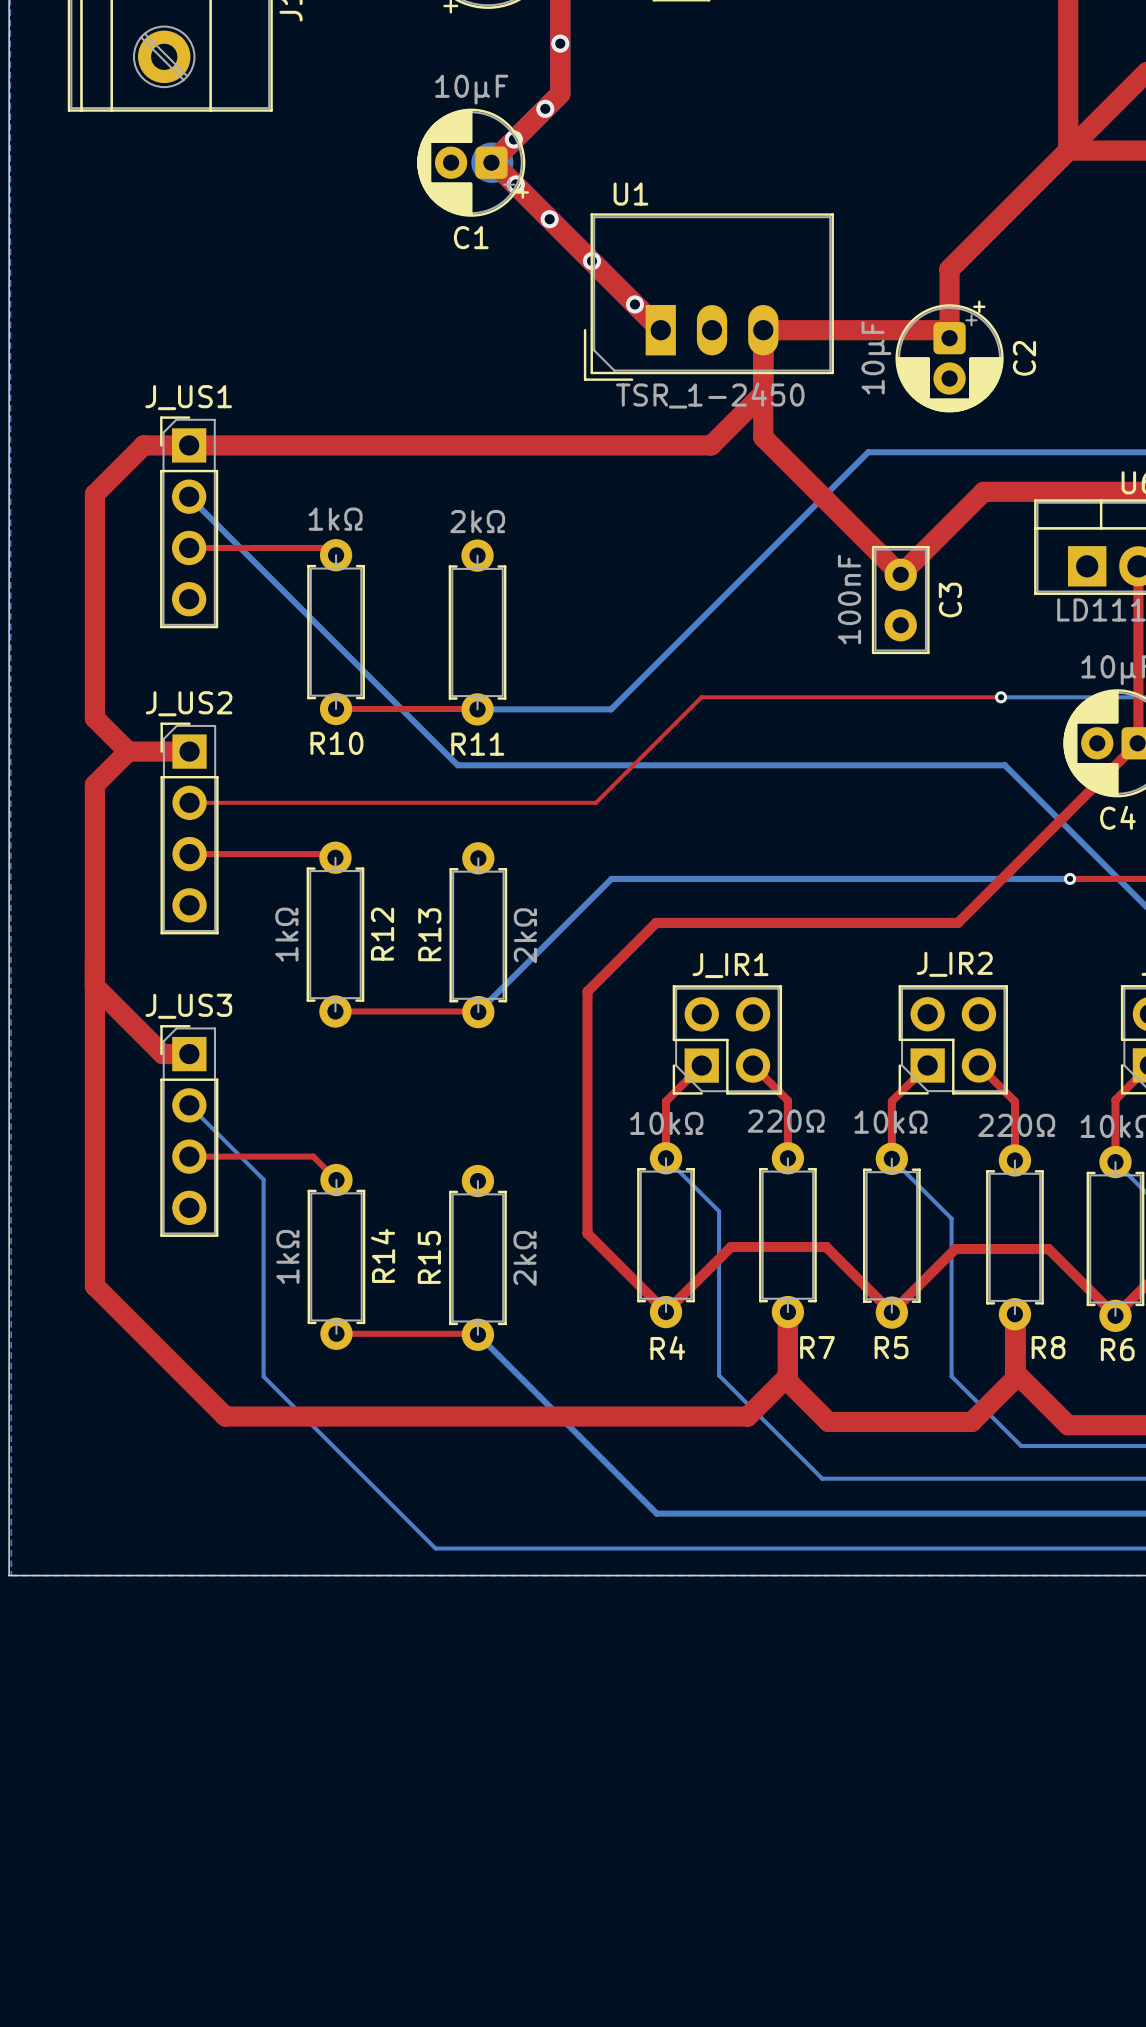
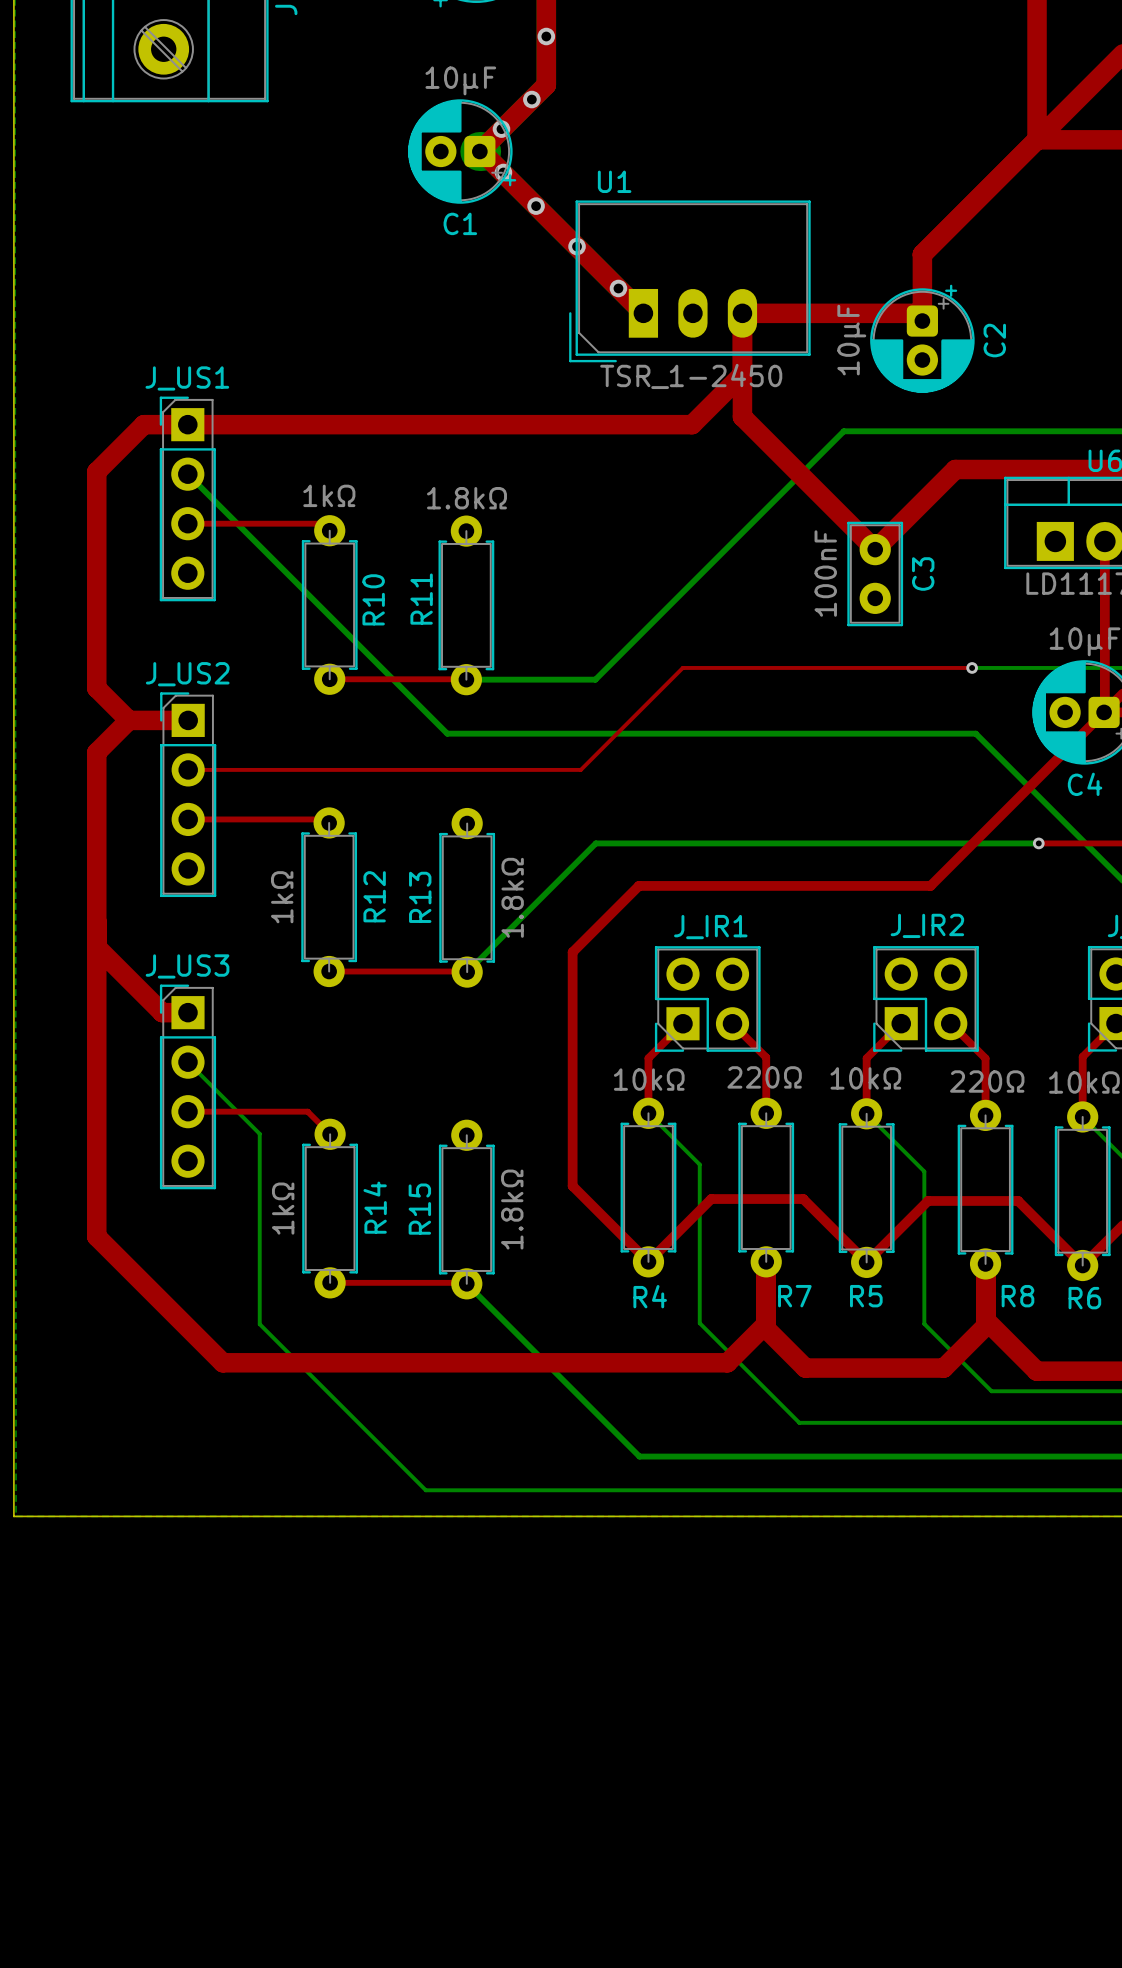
R11 value: 2kΩ (477, 521) -> 1.8kΩ (466, 498)
R10 name rotation: 0° (336, 743) -> 90° counterclockwise (373, 599)
R10 name position: R10 (336, 743) -> R10 (373, 599)
R11 name rotation: 0° (477, 744) -> 90° counterclockwise (421, 599)
R11 name position: R11 (477, 744) -> R11 (421, 599)
R13 value: 2kΩ (525, 935) -> 1.8kΩ (512, 897)
R15 value: 2kΩ (525, 1258) -> 1.8kΩ (512, 1209)

